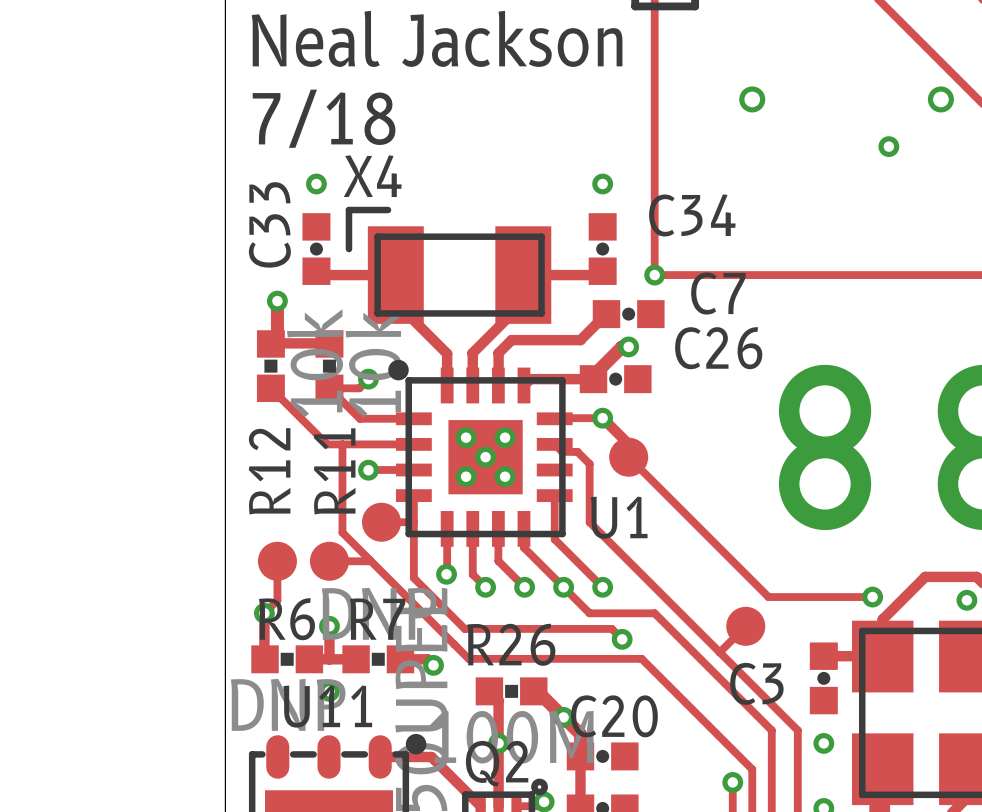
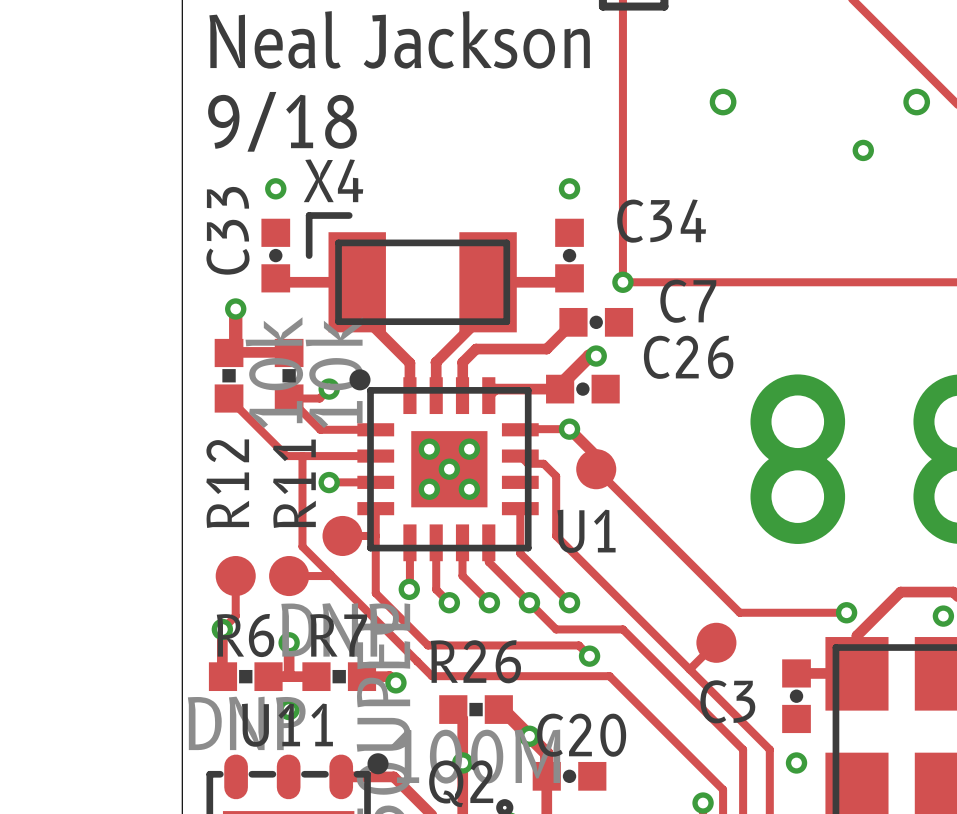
text: 7/18 (324, 118) -> 9/18 (282, 121)

